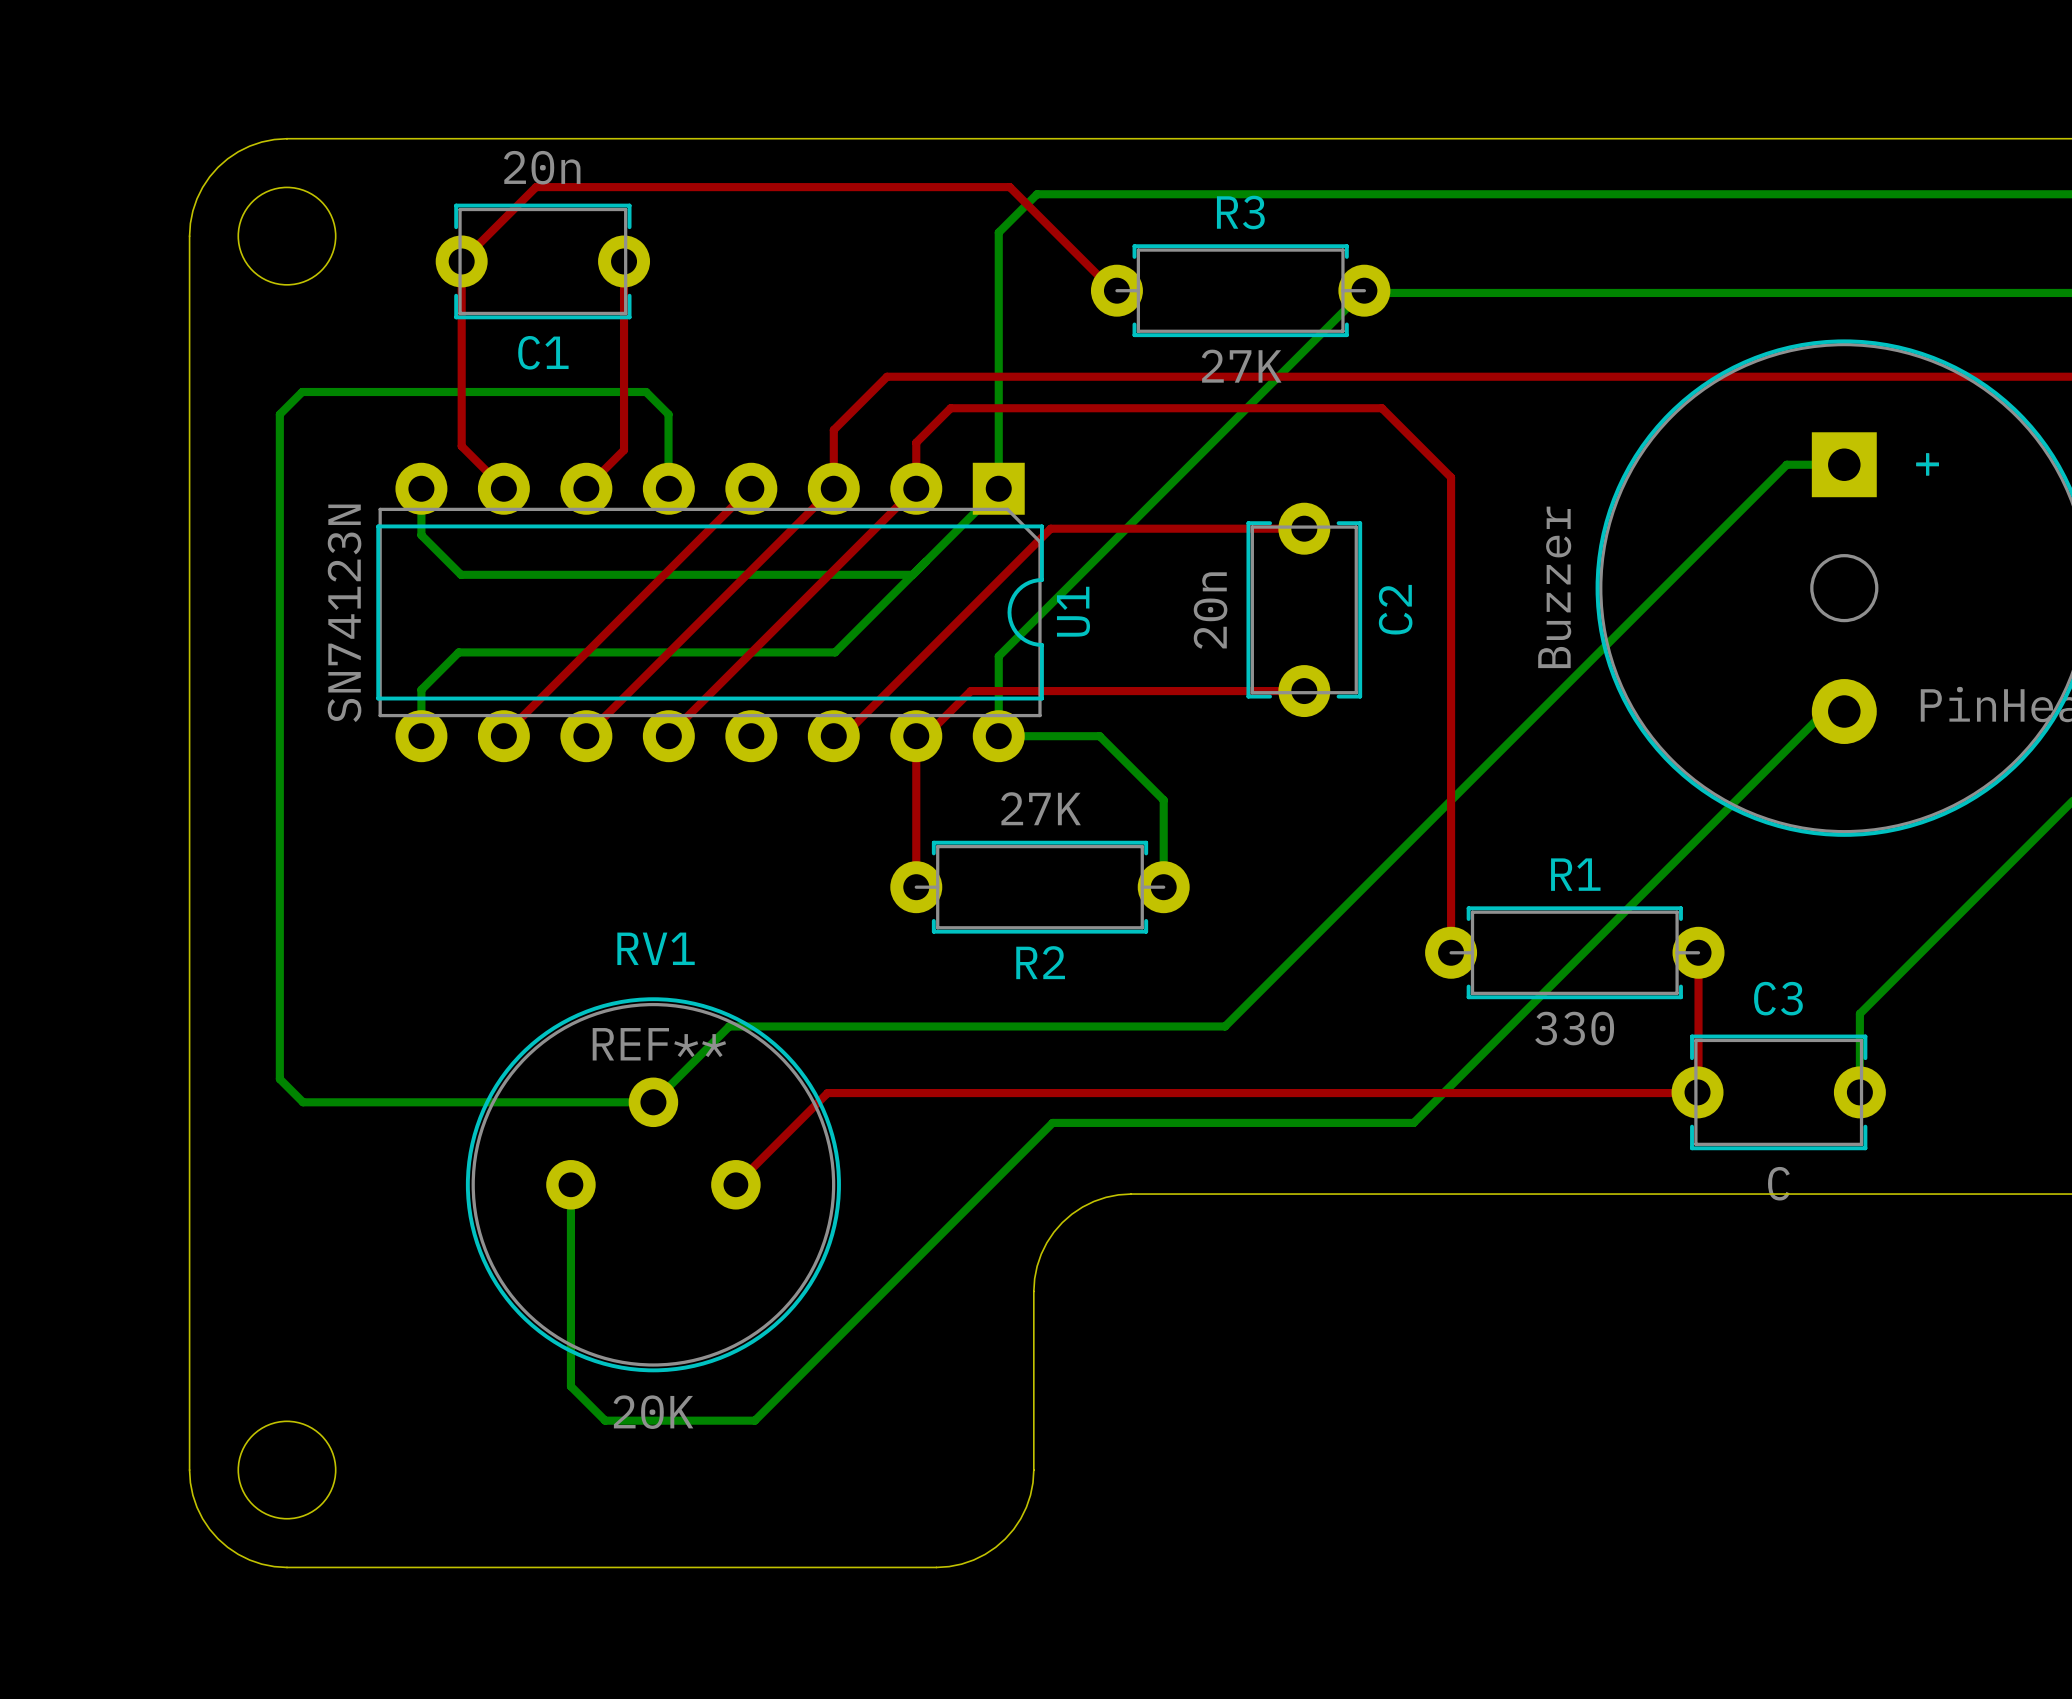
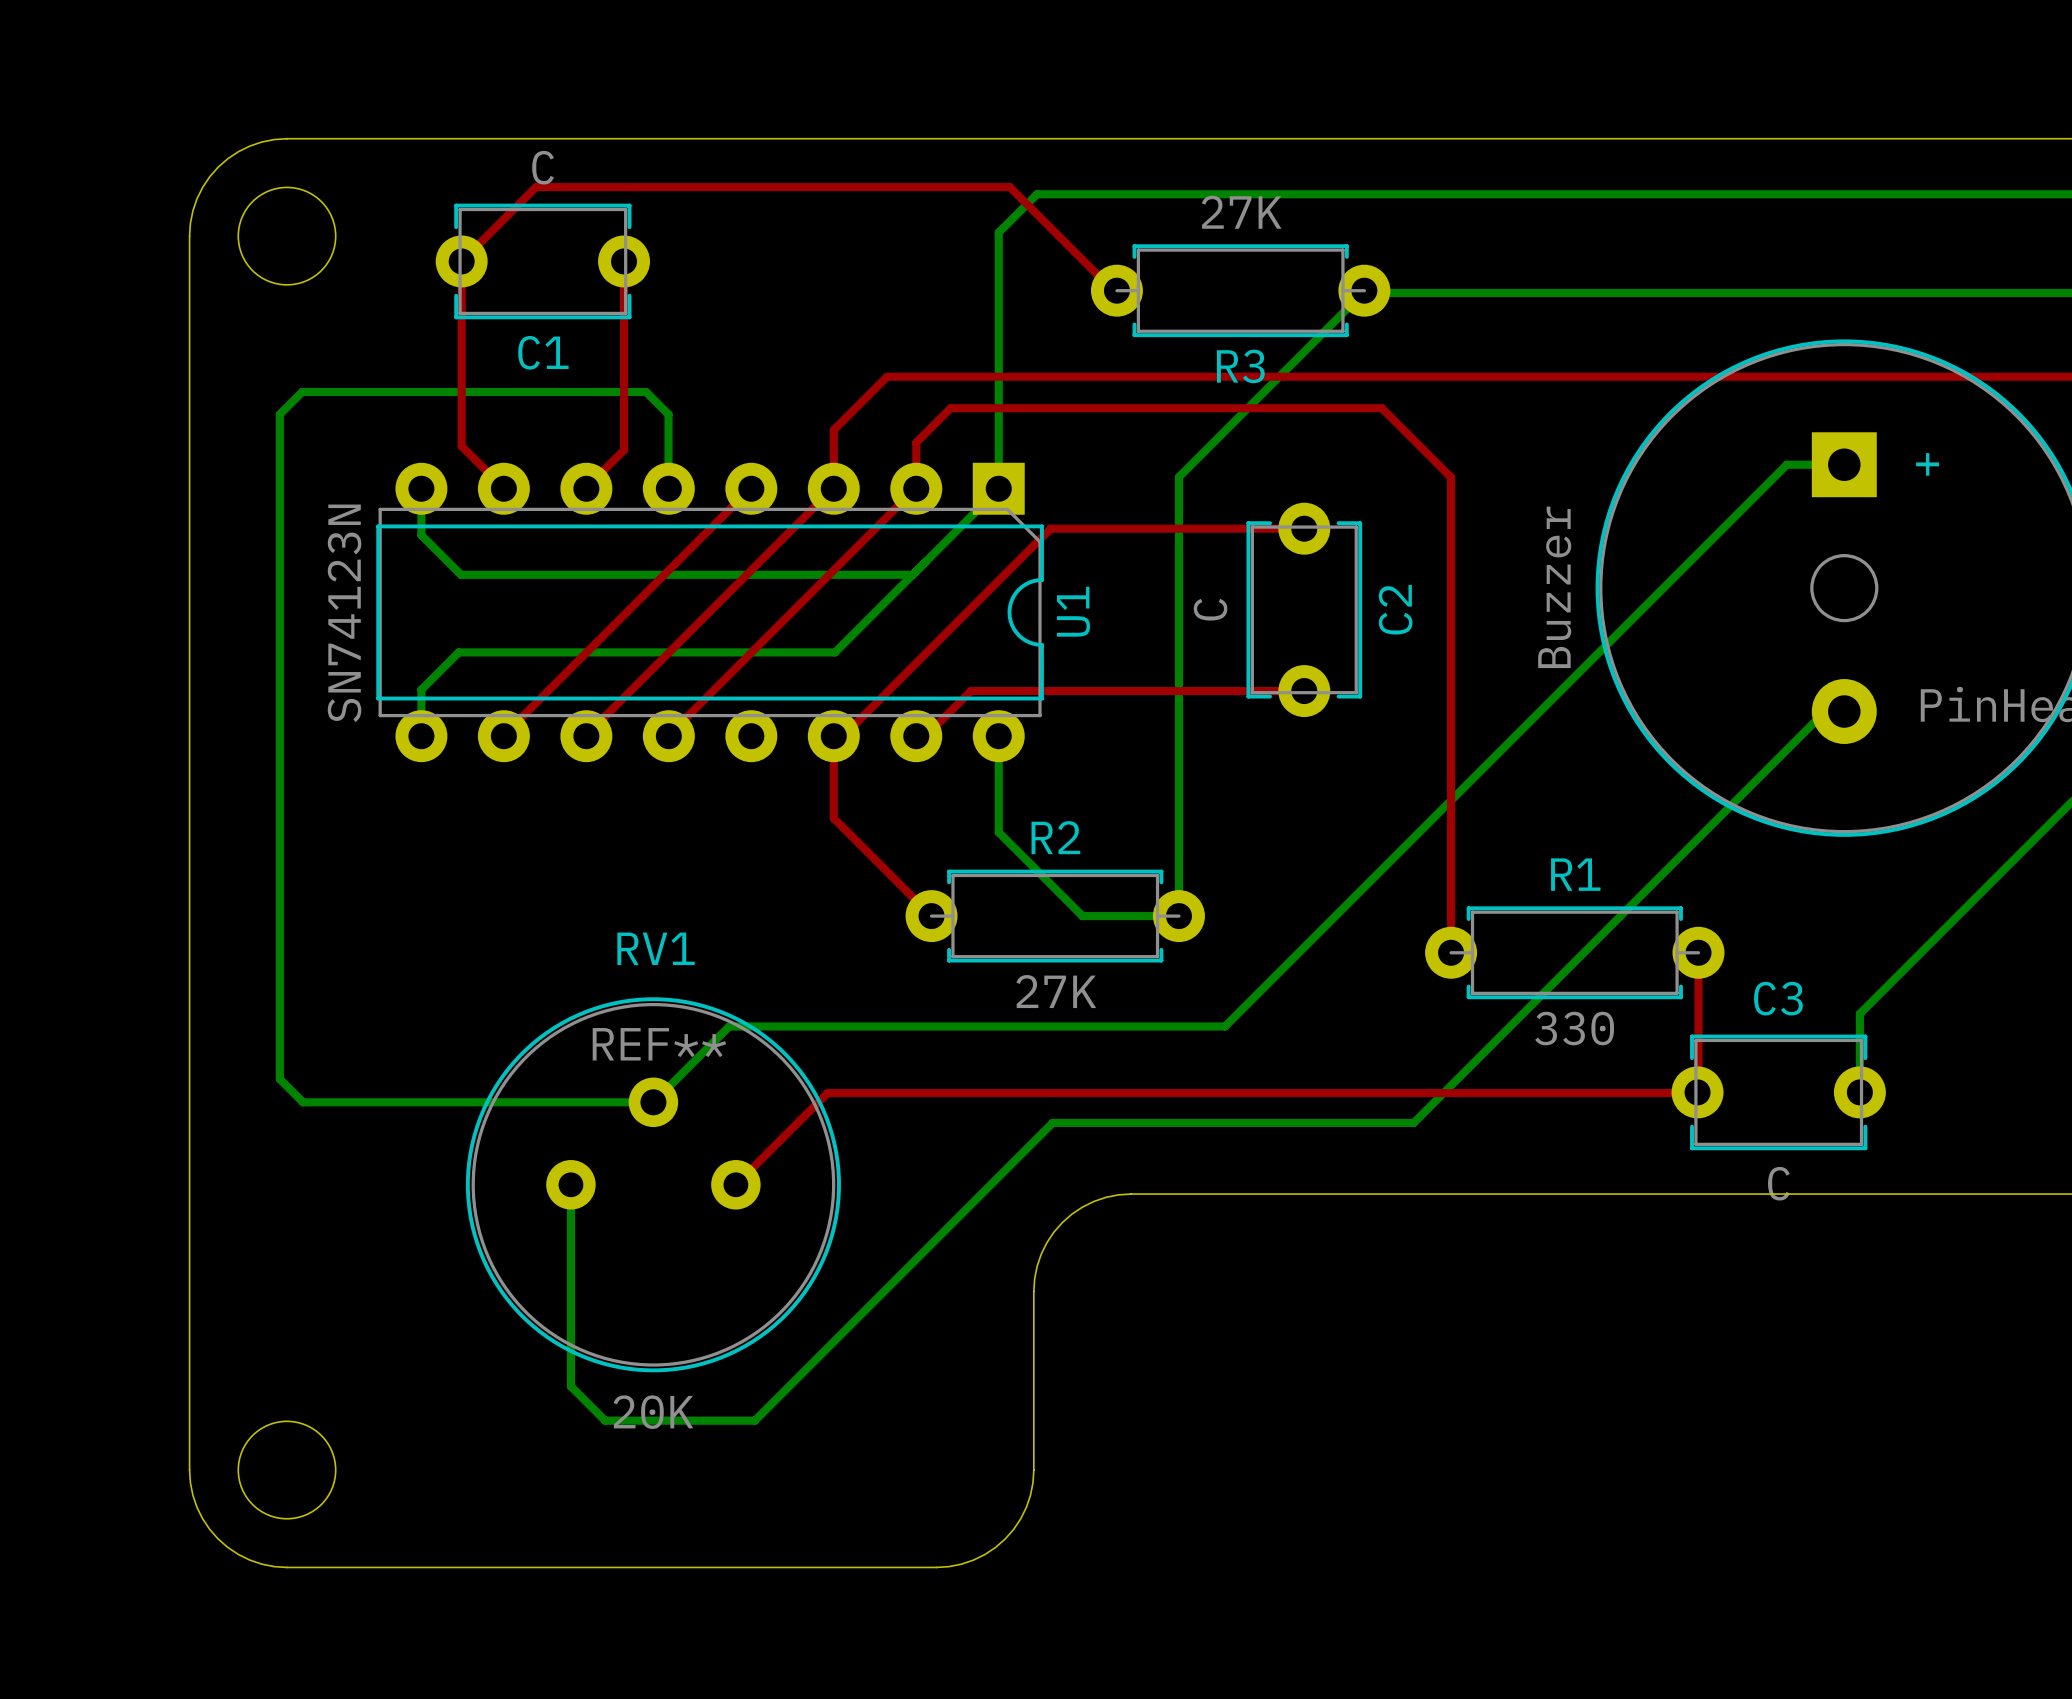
C1 value: 20n (542, 167) -> C (543, 167)
R3 name position: R3 (1240, 212) -> R3 (1240, 366)
bottom track: (1364, 290) (998, 656) (998, 736) (1099, 736) (1163, 800) (1163, 887) -> none
bottom track: none -> (1363, 292) (1178, 477) (1178, 916) (1082, 916) (998, 832) (998, 736)
R3 value position: 27K (1241, 366) -> 27K (1241, 212)
C2 value: 20n (1210, 610) -> C (1210, 609)
top track: none -> (833, 736) (833, 818) (931, 916)
top track: (916, 736) (916, 887) -> none
R2 value position: 27K (1040, 808) -> 27K (1056, 991)
R2 position: (1039, 887) -> (1055, 916)
R2 name position: R2 (1040, 962) -> R2 (1055, 837)

